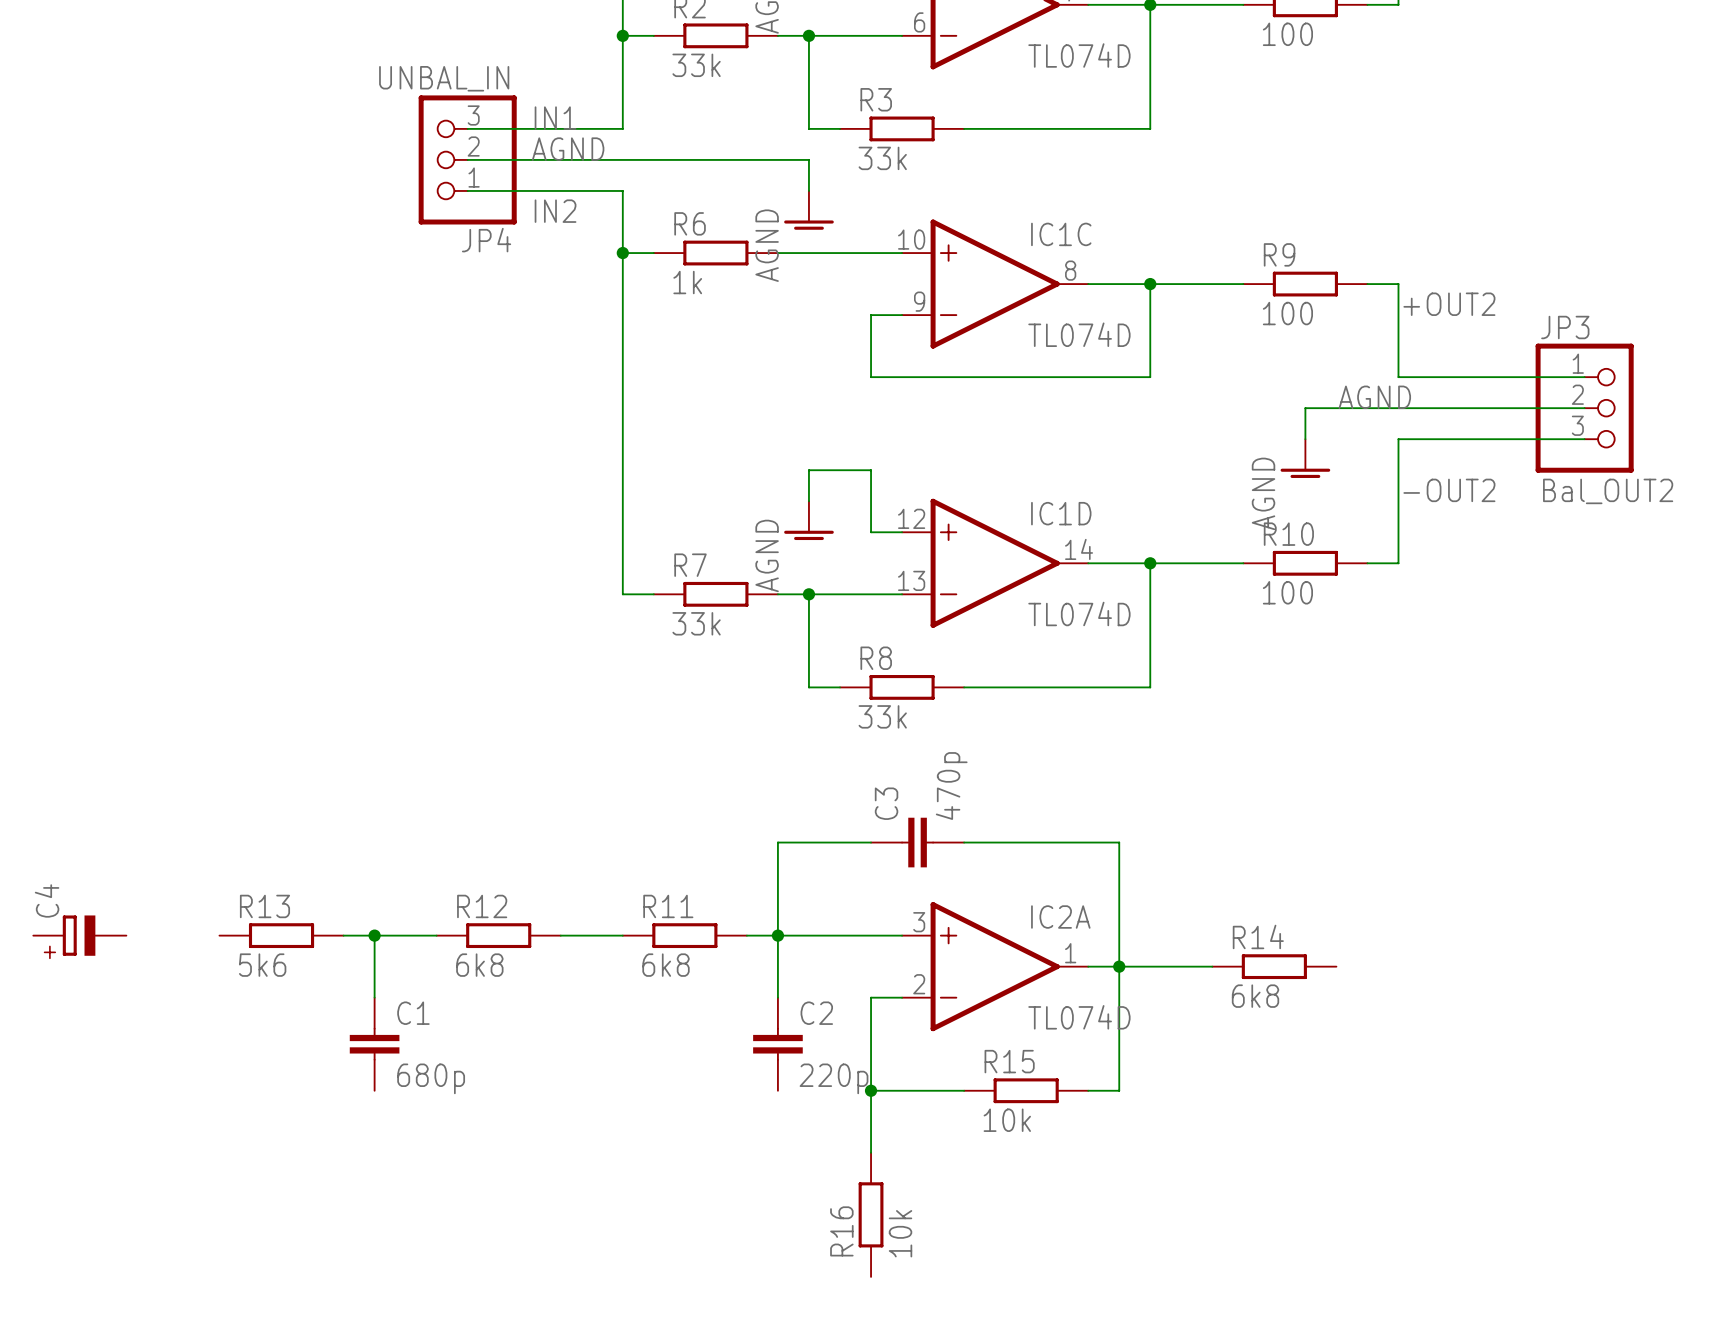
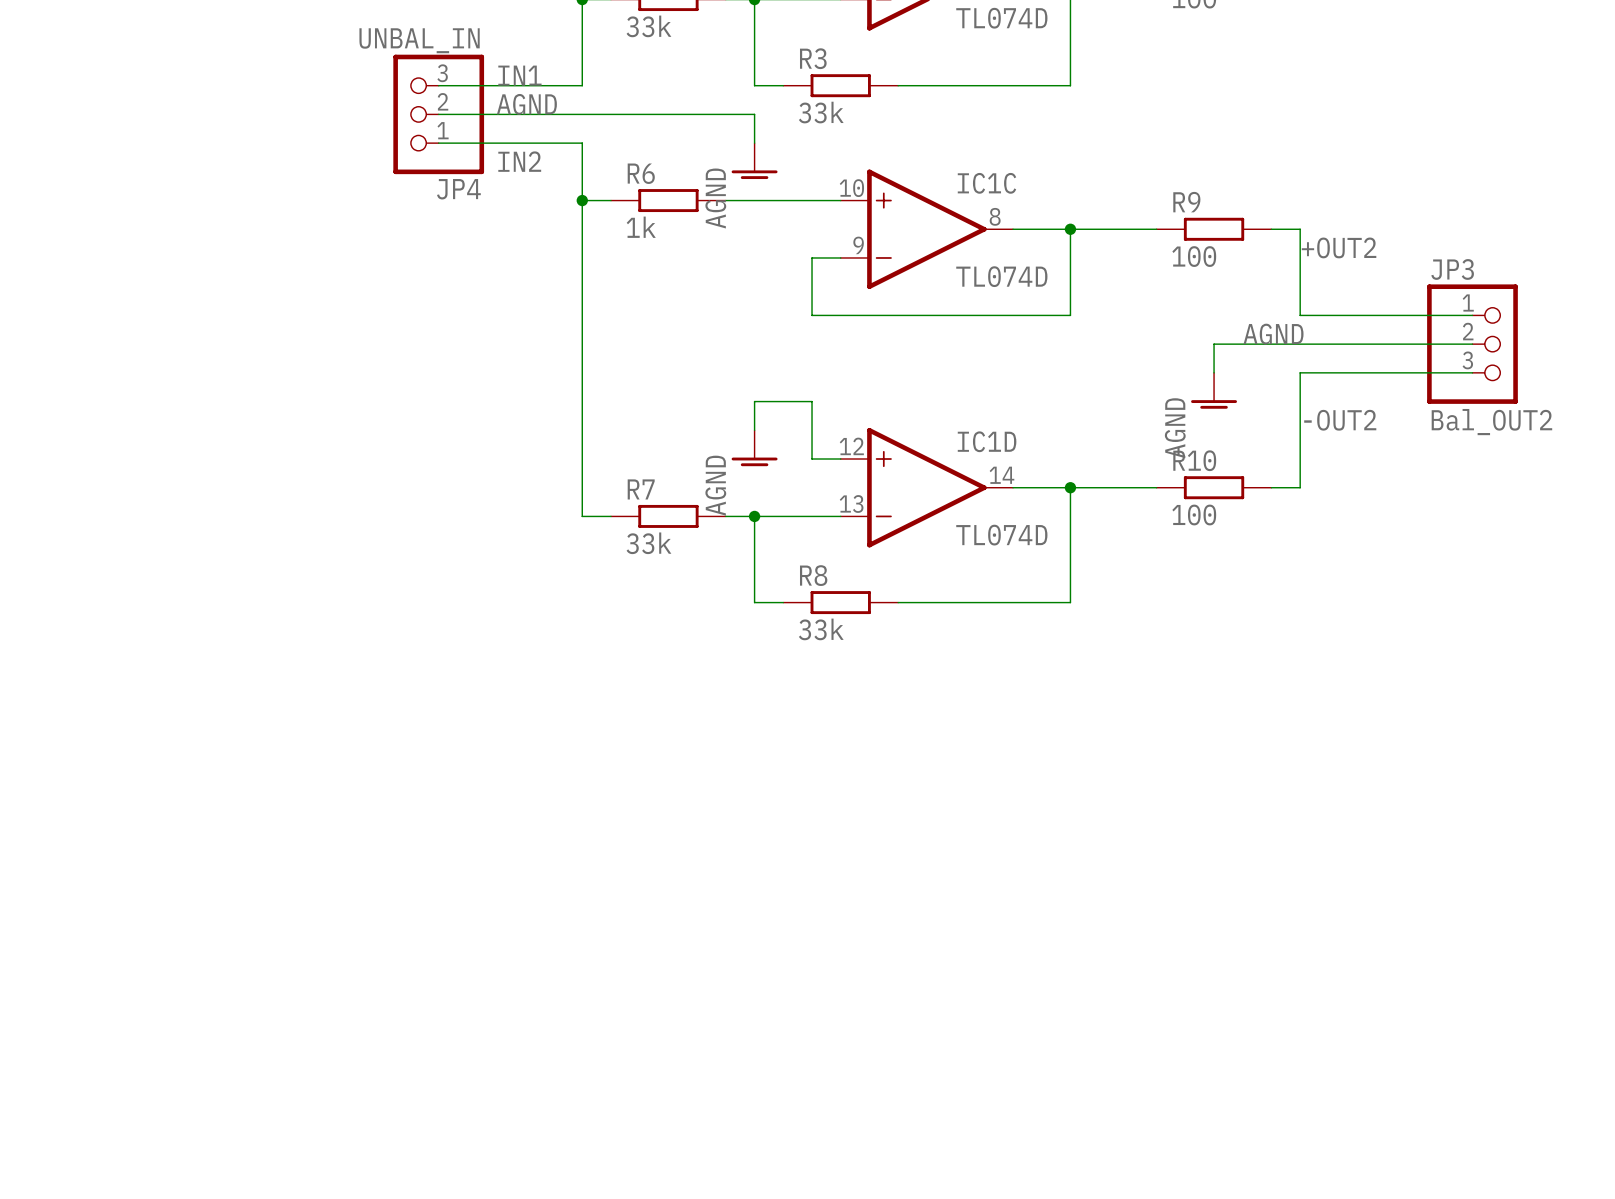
wire: (871, 842) (777, 842) (777, 997) -> none
C3: 470p (917, 842) -> none
wire: (964, 842) (1119, 842) (1119, 1090) (1088, 1090) -> none
C4: (79, 935) -> none
R13: 5k6 (281, 935) -> none
wire: (343, 935) (436, 935) -> none
wire: (374, 935) (374, 997) -> none
junction: (374, 935) -> none
R12: 6k8 (498, 935) -> none
wire: (560, 935) (622, 935) -> none
R11: 6k8 (684, 935) -> none
wire: (746, 935) (902, 935) -> none
junction: (777, 935) -> none
IC2A: TL074D (995, 966) -> none
wire: (1088, 966) (1212, 966) -> none
junction: (1119, 966) -> none
R14: 6k8 (1274, 966) -> none
wire: (902, 997) (871, 997) (871, 1152) -> none
C1: 680p (374, 1044) -> none
C2: 220p (777, 1044) -> none
wire: (871, 1090) (964, 1090) -> none
junction: (871, 1090) -> none
R15: 10k (1026, 1090) -> none
R16: 10k (871, 1214) -> none

